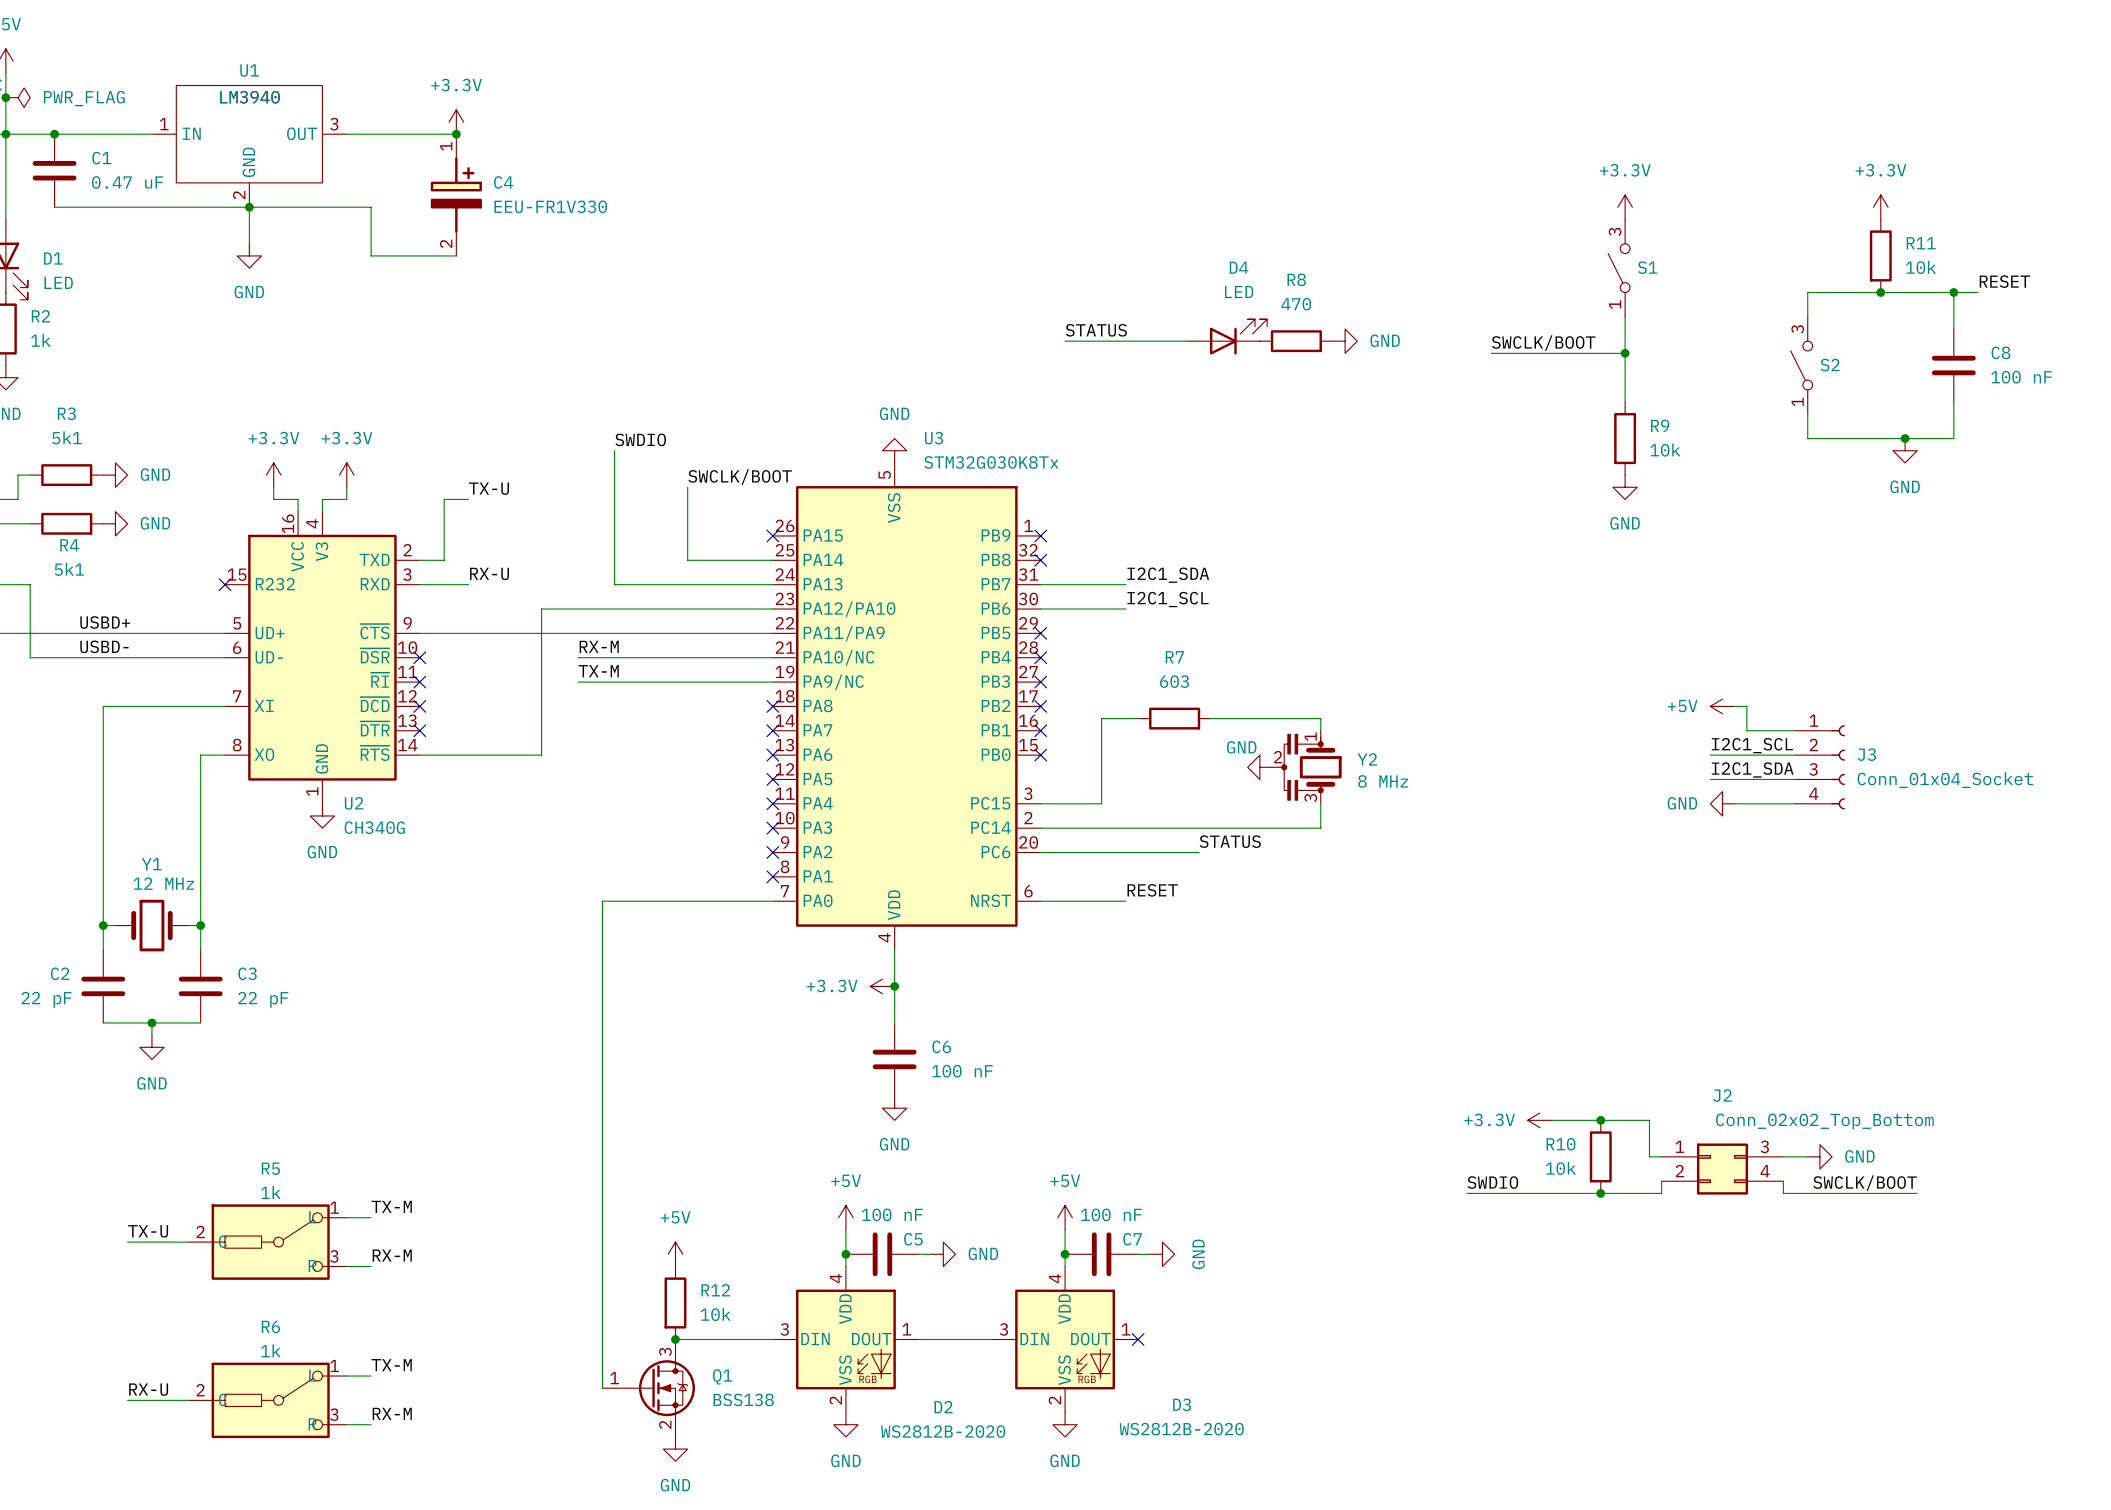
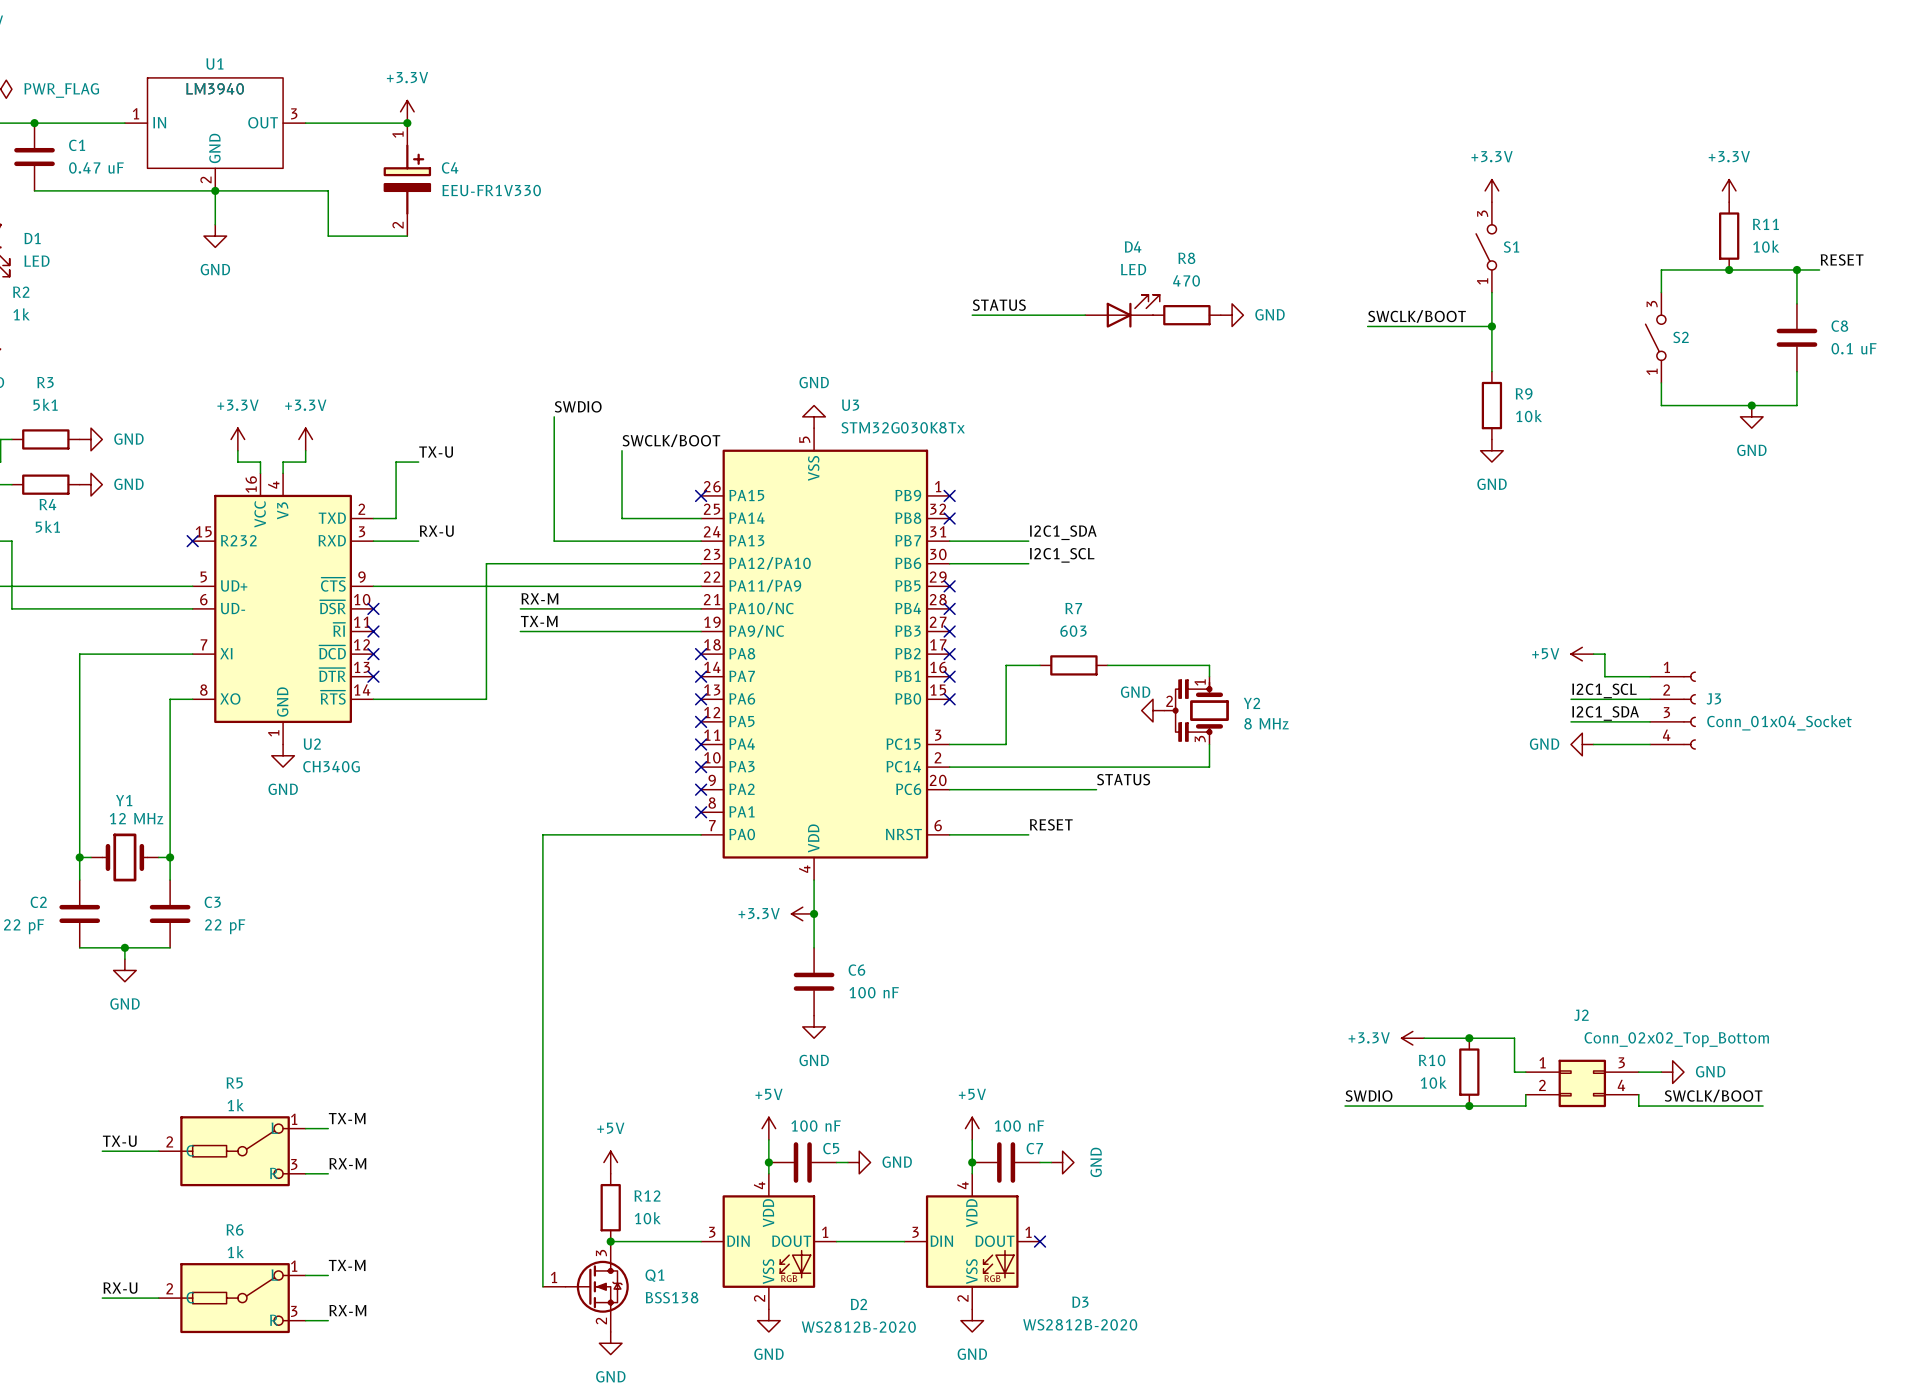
C8 value: 100 nF (2021, 377) -> 0.1 uF (1854, 348)
label: USBD+ (105, 622) -> none
label: USBD- (104, 646) -> none

